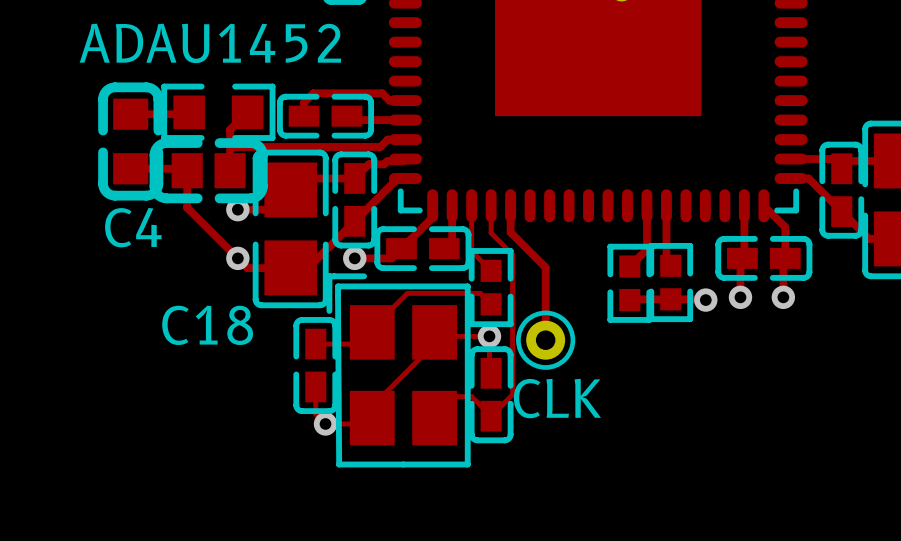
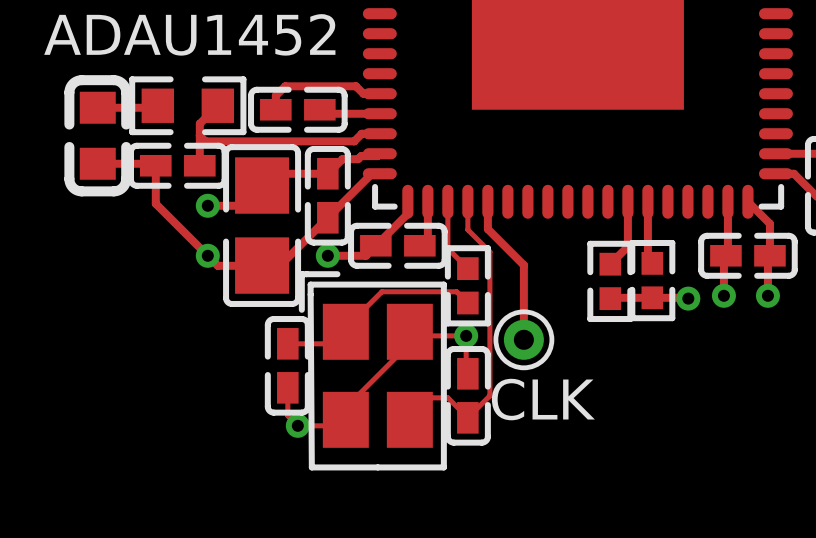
C18: (208, 170) -> none
part: none -> (177, 165)
C4 name: C4 (133, 227) -> none

